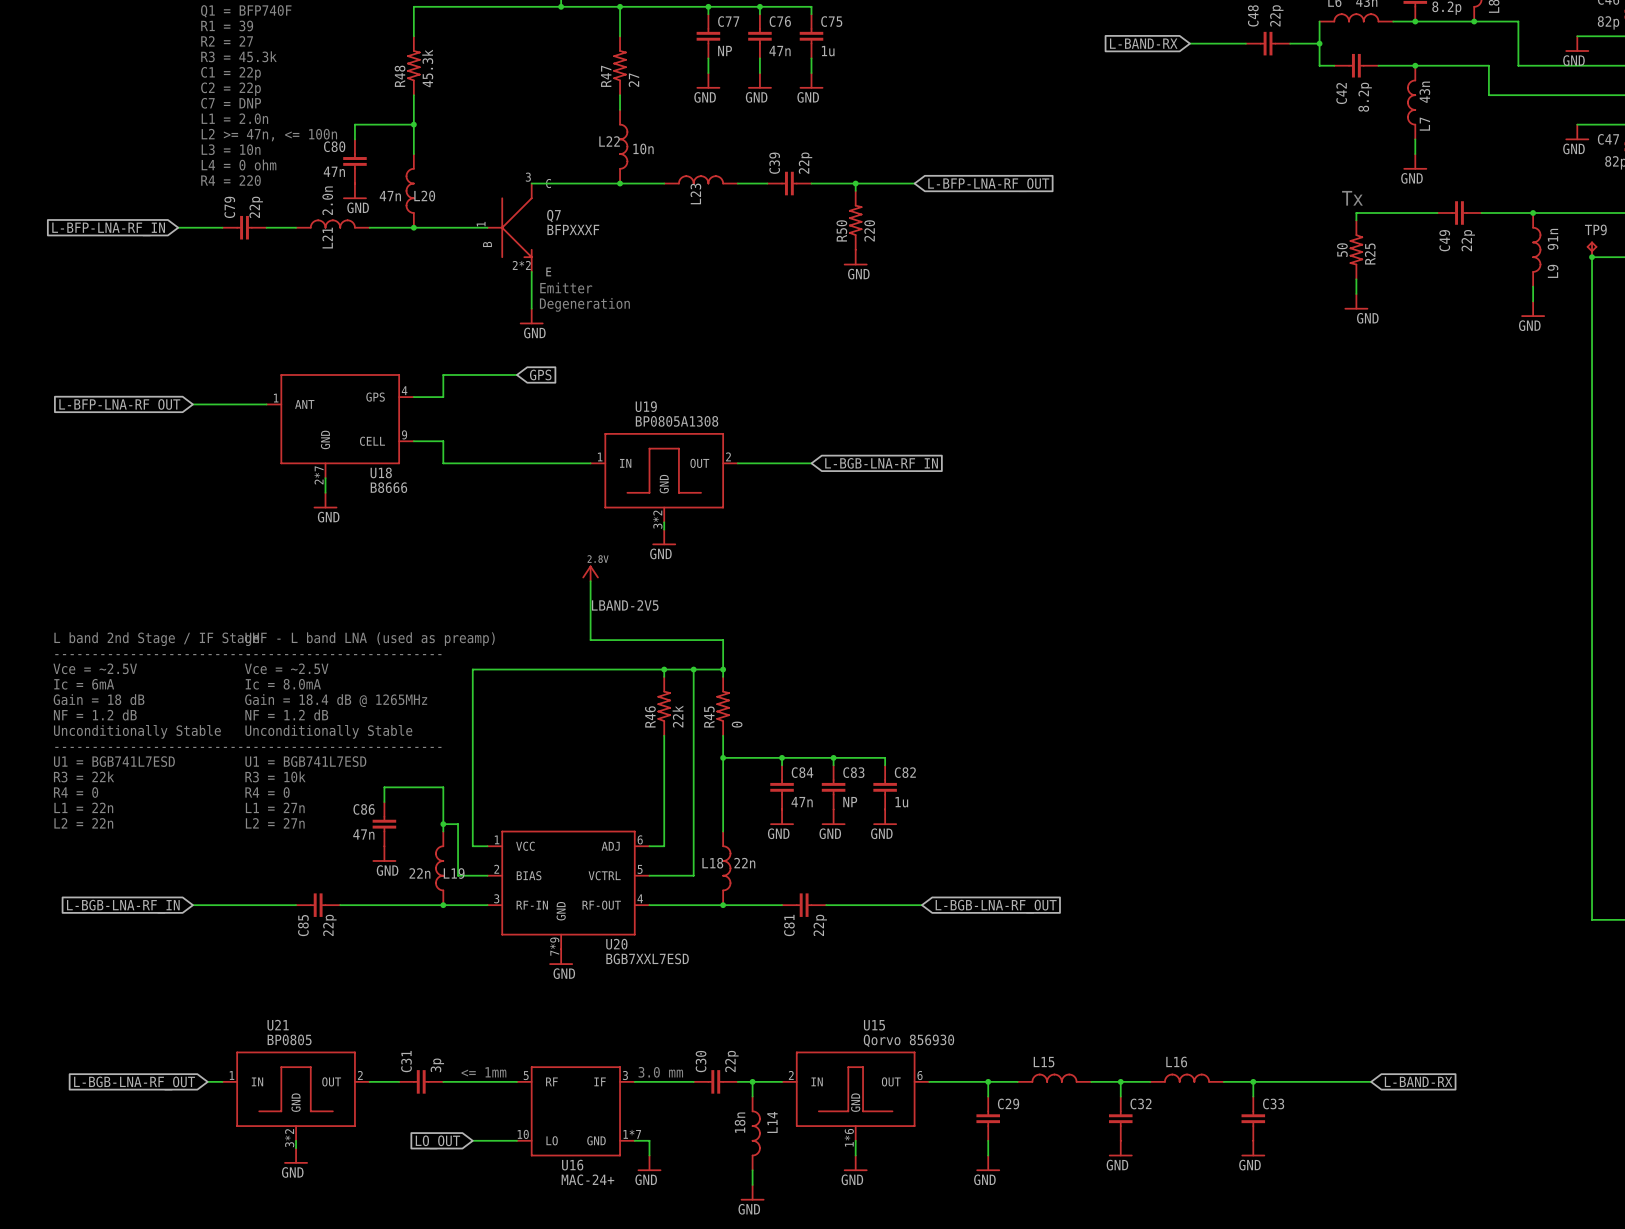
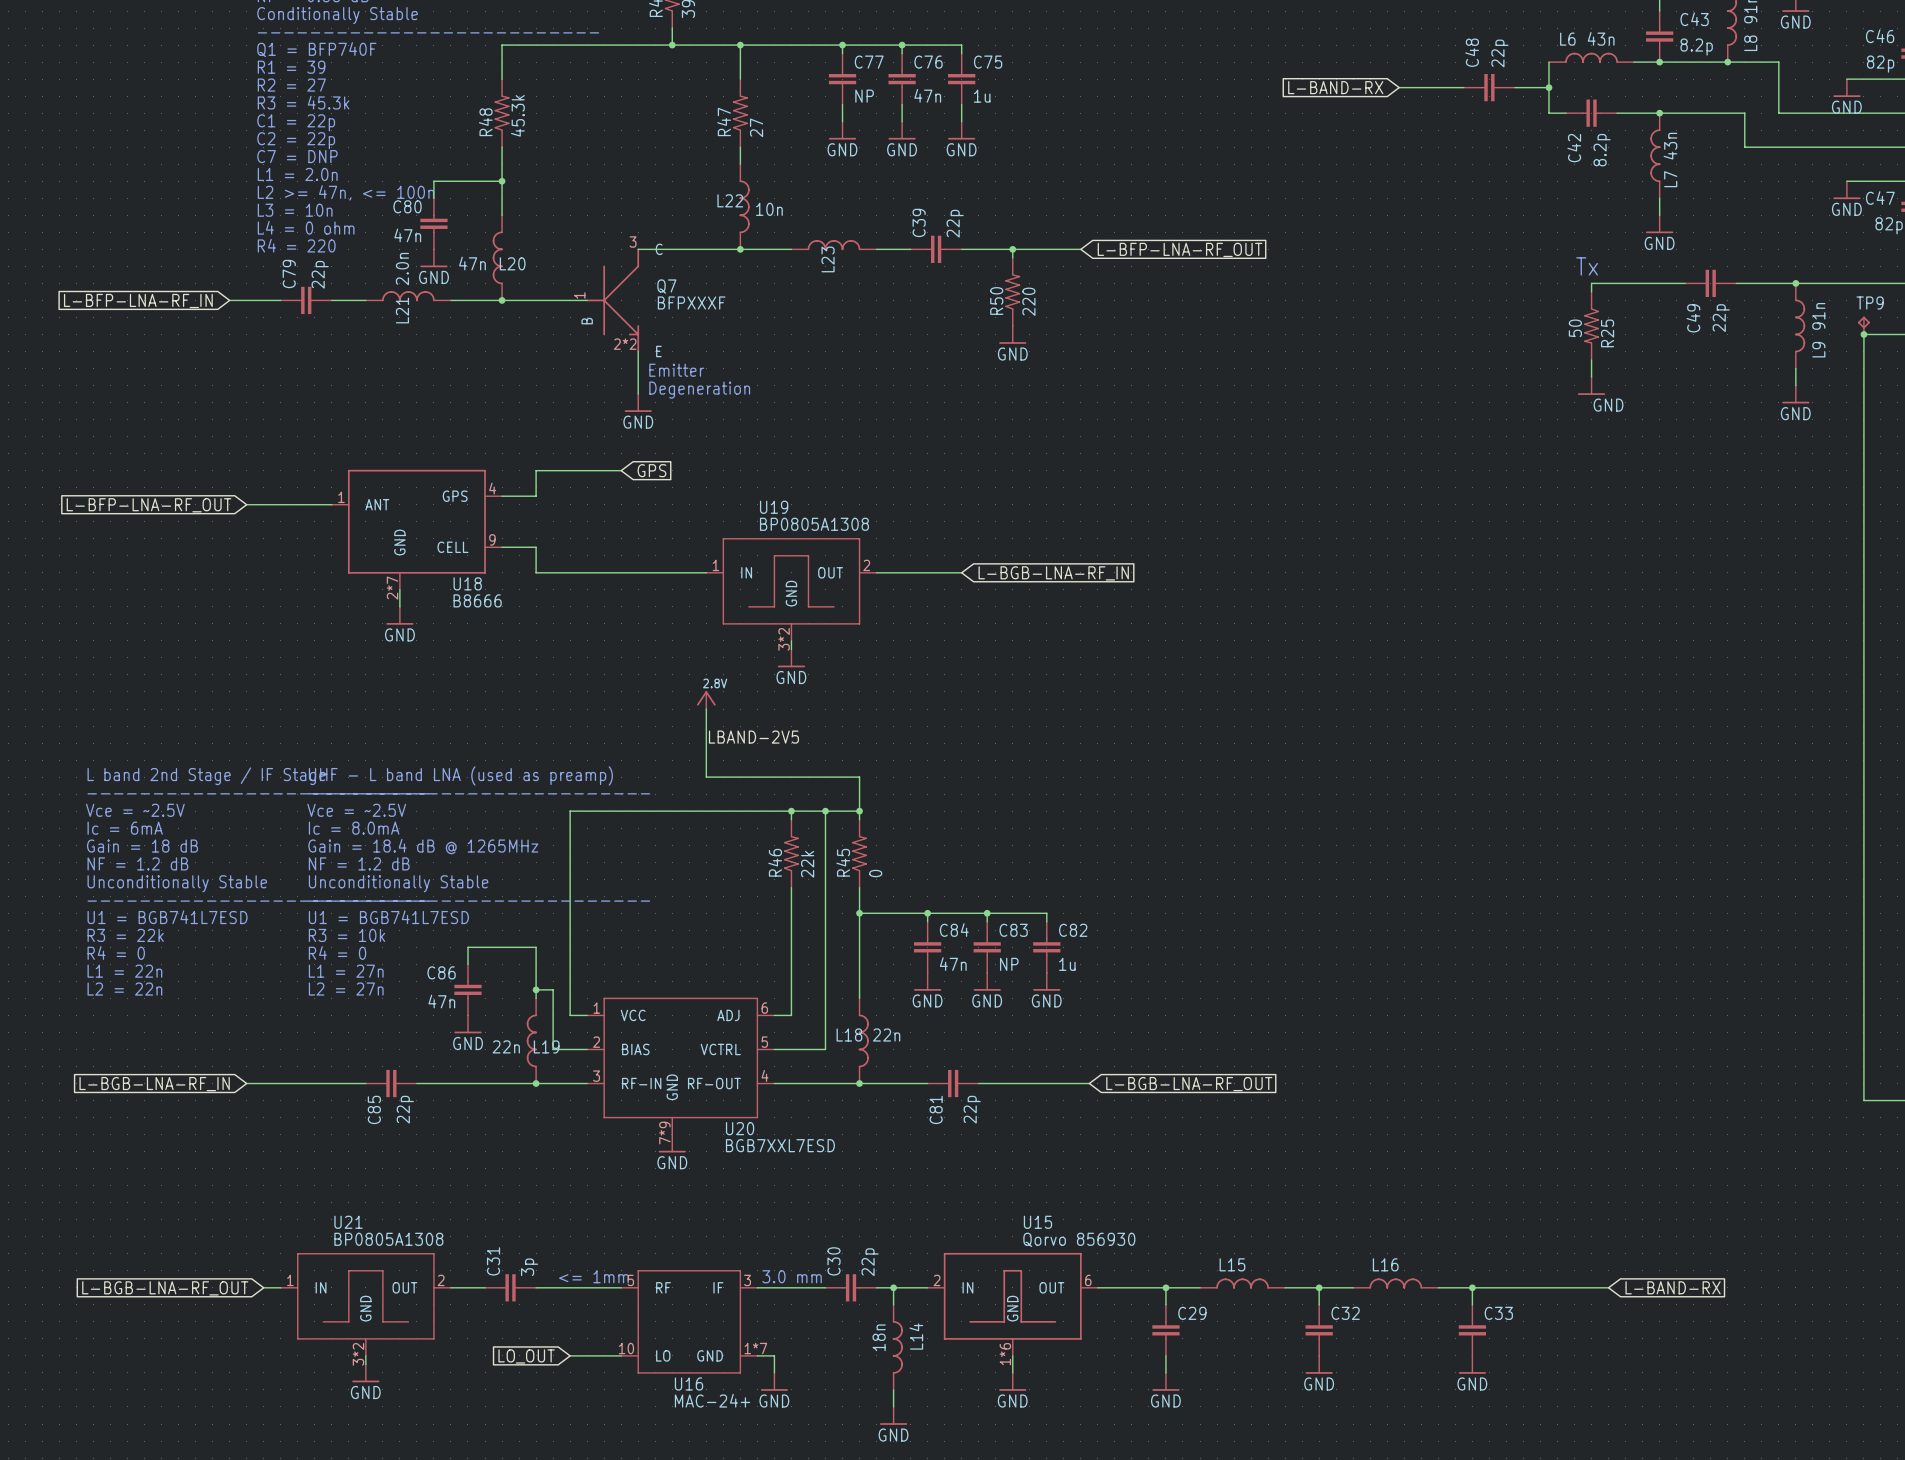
U21 value: BP0805 (289, 1039) -> BP0805A1308 (388, 1239)

